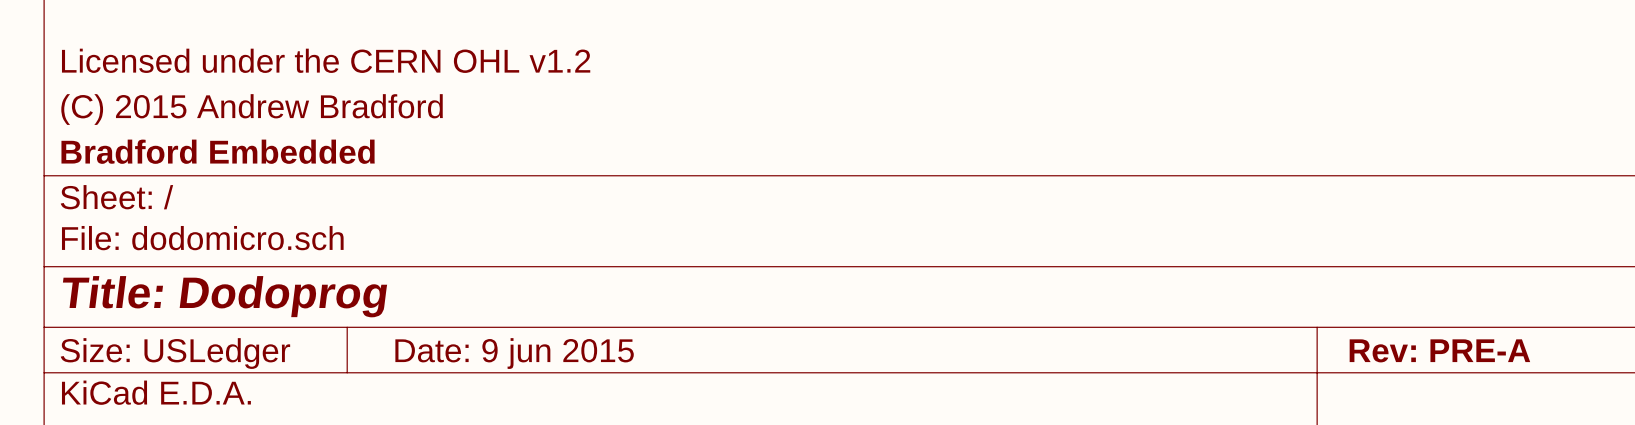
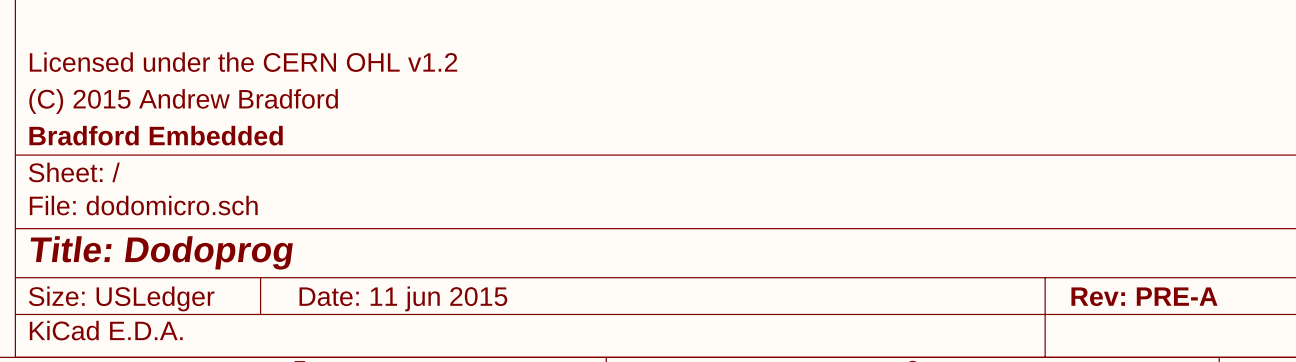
title block: Date: 9 jun 2015 (514, 353) -> Date: 11 jun 2015 (403, 298)

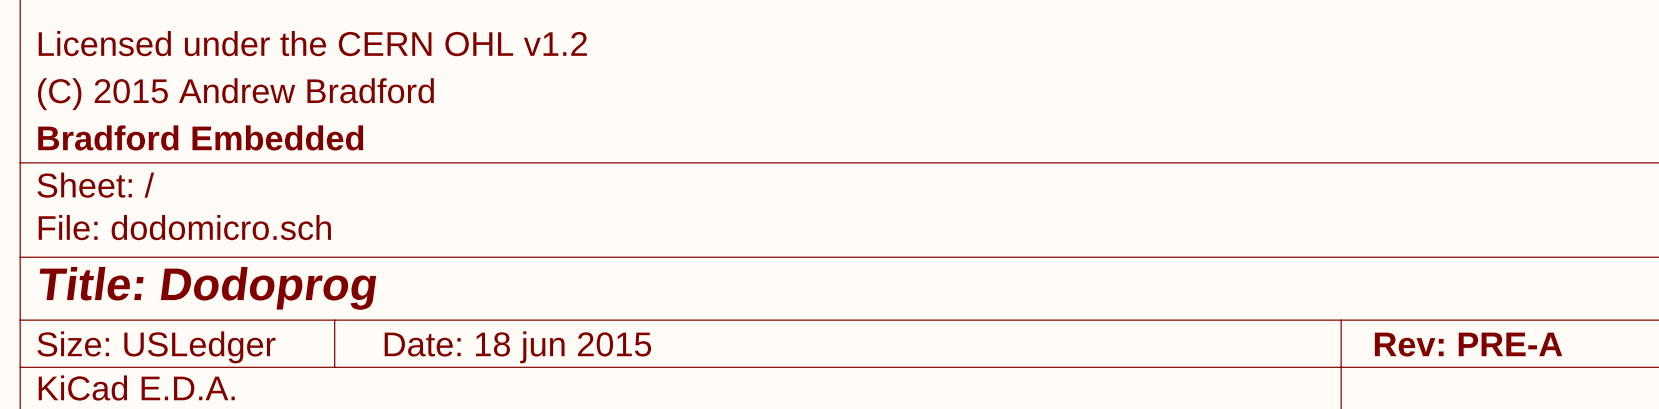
title block: Date: 11 jun 2015 (403, 298) -> Date: 18 jun 2015 (517, 347)

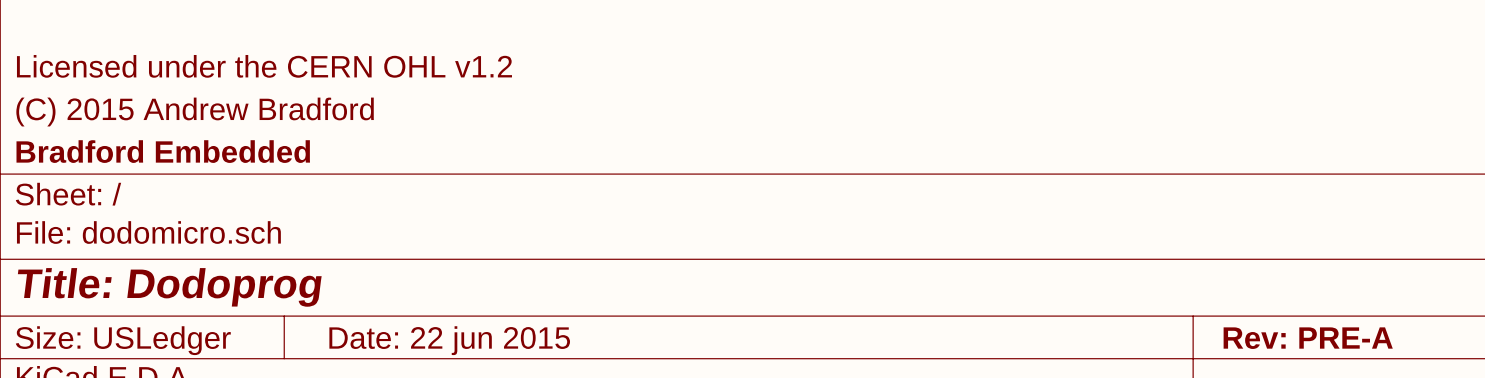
title block: Date: 18 jun 2015 (517, 347) -> Date: 22 jun 2015 (449, 340)

